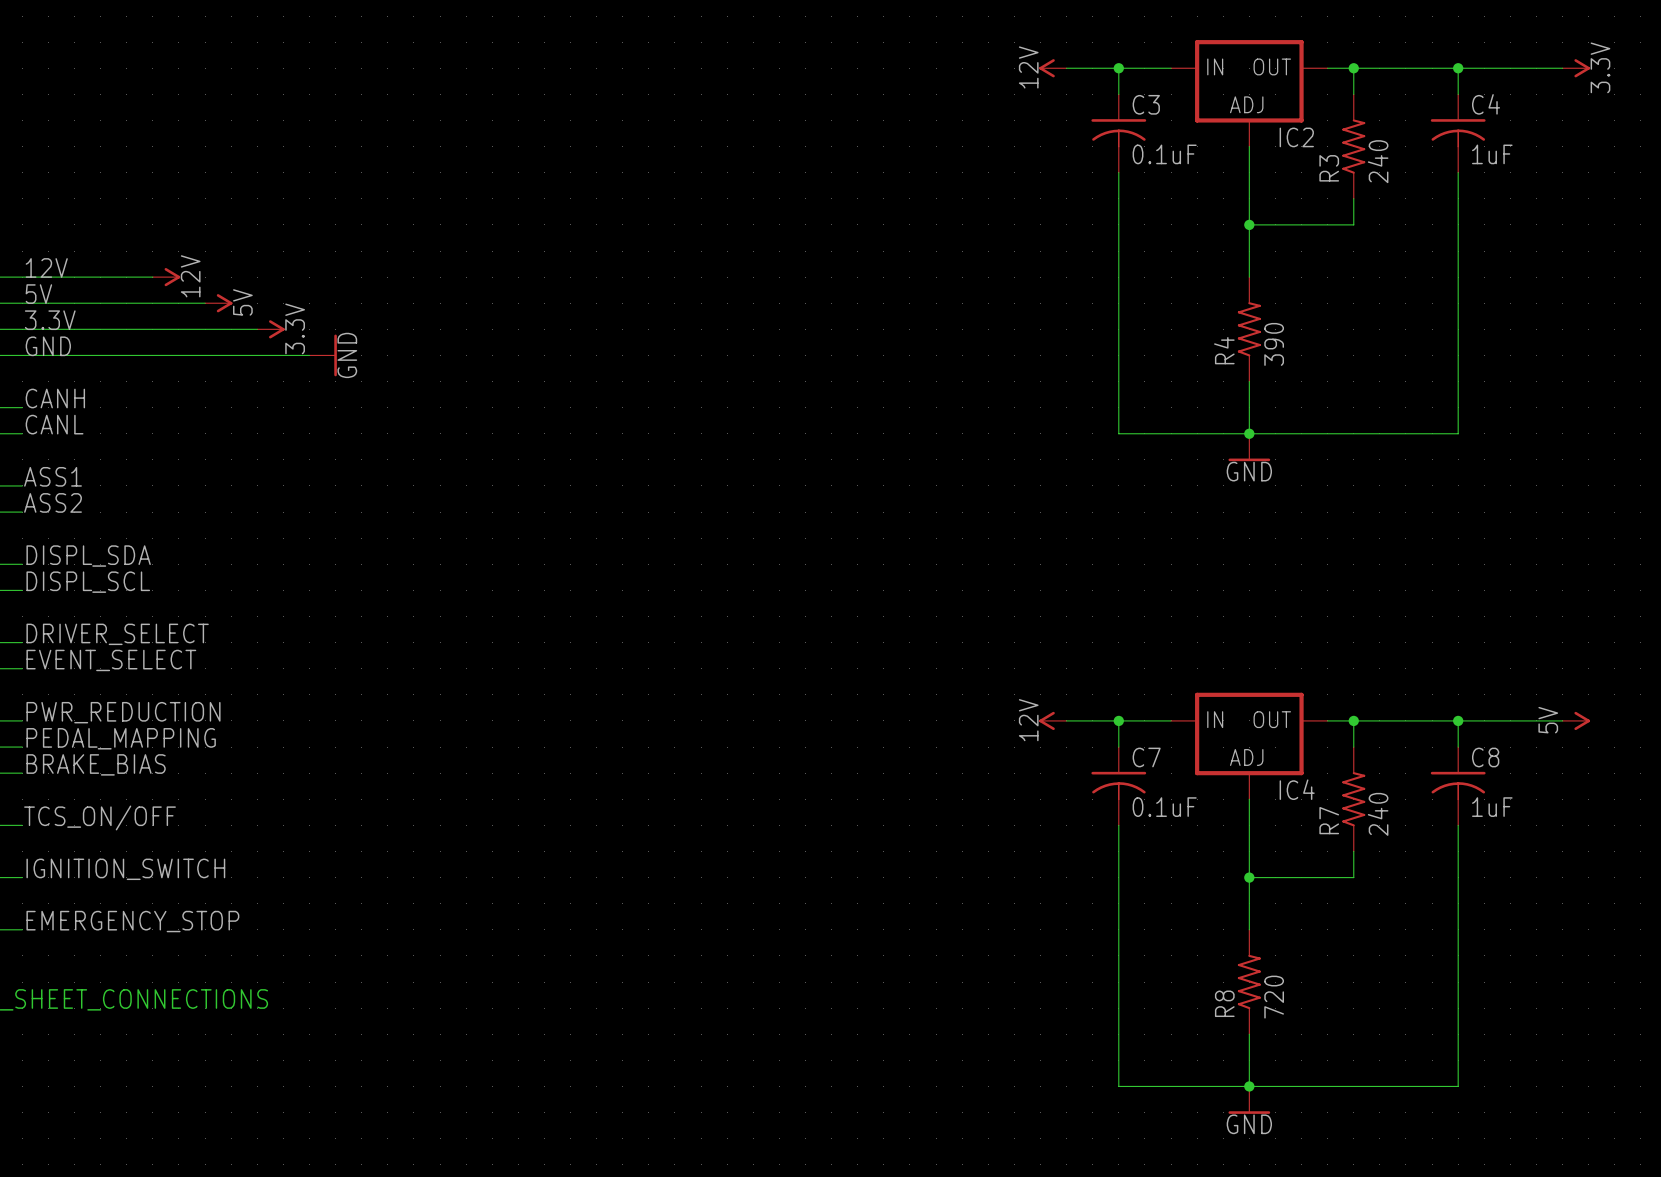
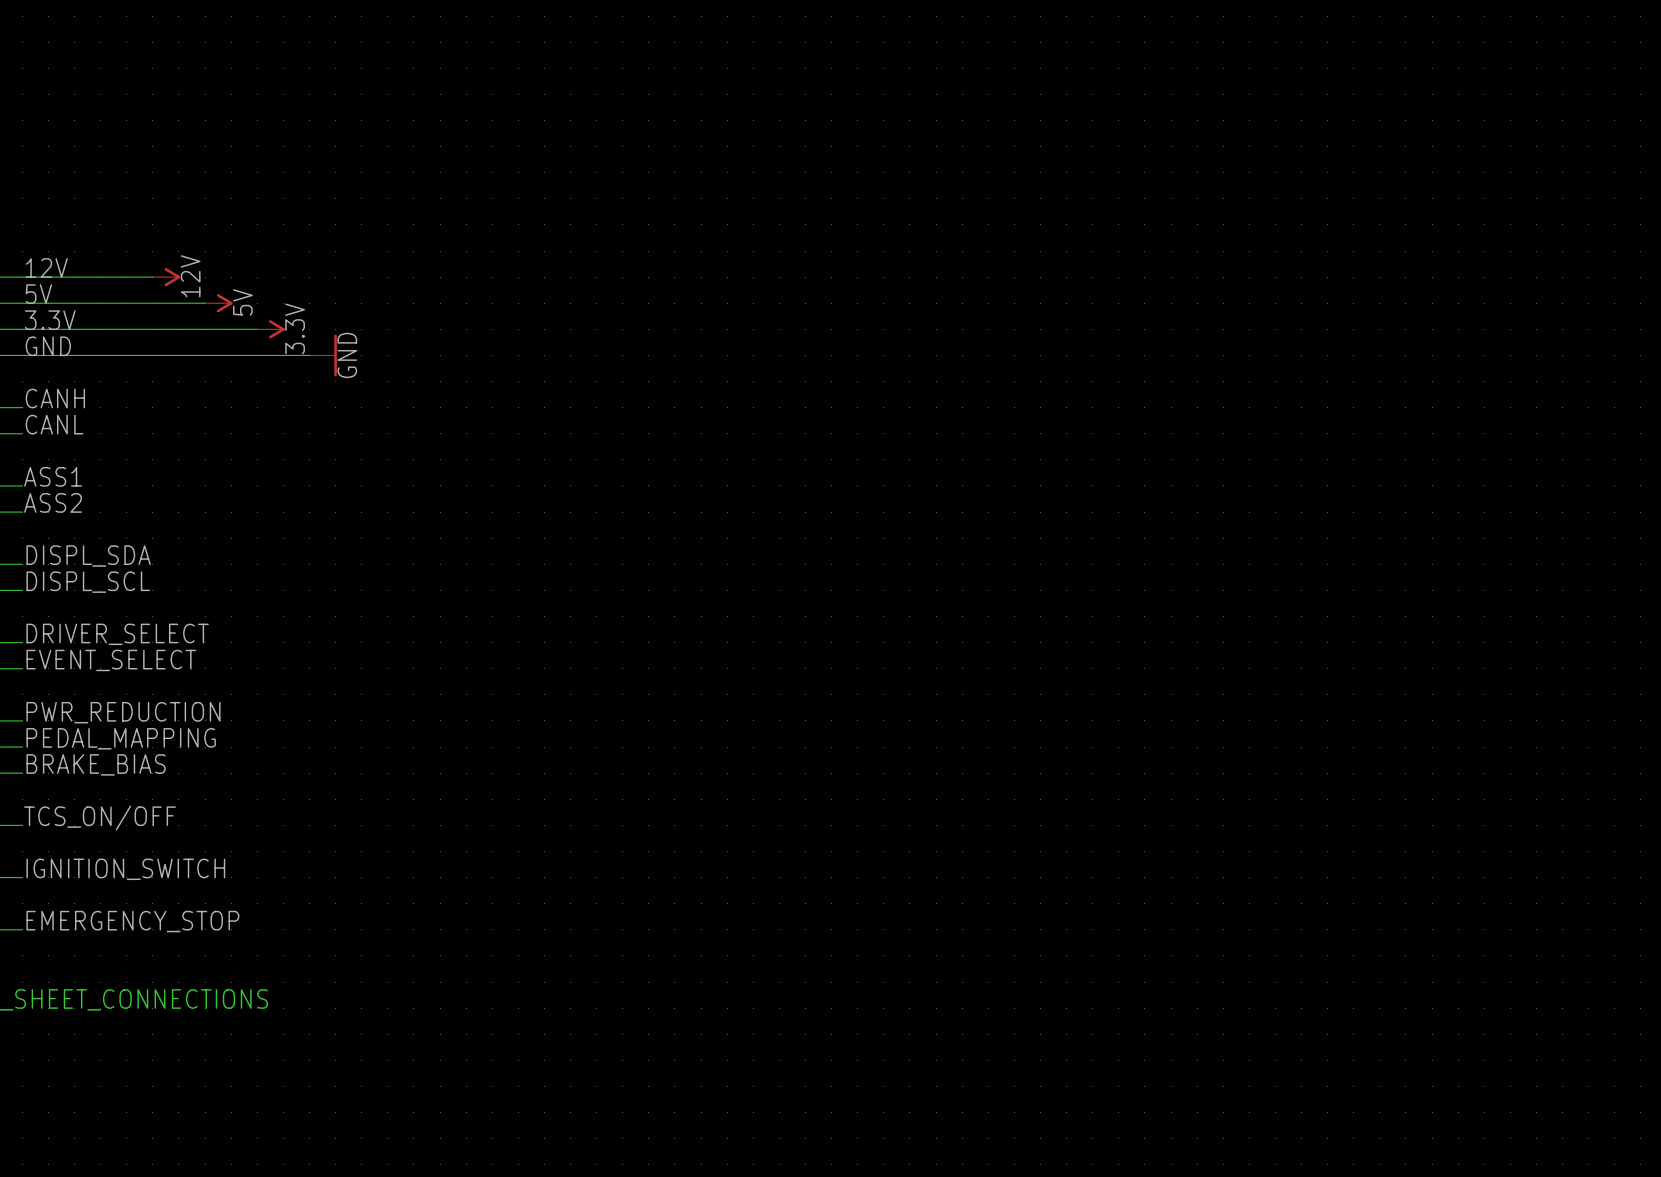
power symbol: 12V (1052, 68) -> none
wire: (1066, 68) (1171, 68) -> none
wire: (1118, 68) (1118, 94) -> none
junction: (1118, 68) -> none
wire: (1327, 68) (1562, 68) -> none
wire: (1353, 68) (1353, 94) -> none
junction: (1353, 68) -> none
wire: (1458, 68) (1458, 94) -> none
junction: (1458, 68) -> none
power symbol: 3.3V (1576, 68) -> none
IC2: (1249, 93) -> none
C3: 0.1uF (1118, 133) -> none
C4: 1uF (1458, 133) -> none
wire: (1249, 146) (1249, 277) -> none
R3: 240 (1353, 146) -> none
wire: (1118, 172) (1118, 433) (1458, 433) (1458, 172) -> none
wire: (1353, 198) (1353, 224) (1249, 224) -> none
junction: (1249, 224) -> none
R4: 390 (1249, 329) -> none
wire: (1249, 381) (1249, 433) -> none
junction: (1249, 433) -> none
power symbol: GND (1249, 447) -> none
power symbol: 12V (1052, 720) -> none
wire: (1066, 720) (1171, 720) -> none
wire: (1118, 720) (1118, 747) -> none
junction: (1118, 720) -> none
wire: (1327, 720) (1562, 720) -> none
wire: (1353, 720) (1353, 747) -> none
junction: (1353, 720) -> none
wire: (1458, 720) (1458, 747) -> none
junction: (1458, 720) -> none
power symbol: 5V (1576, 720) -> none
IC4: (1249, 746) -> none
C7: 0.1uF (1118, 786) -> none
C8: 1uF (1458, 786) -> none
wire: (1249, 799) (1249, 929) -> none
R7: 240 (1353, 799) -> none
wire: (1118, 825) (1118, 1086) (1458, 1086) (1458, 825) -> none
wire: (1353, 851) (1353, 877) (1249, 877) -> none
junction: (1249, 877) -> none
R8: 720 (1249, 982) -> none
wire: (1249, 1034) (1249, 1086) -> none
junction: (1249, 1086) -> none
power symbol: GND (1249, 1100) -> none

